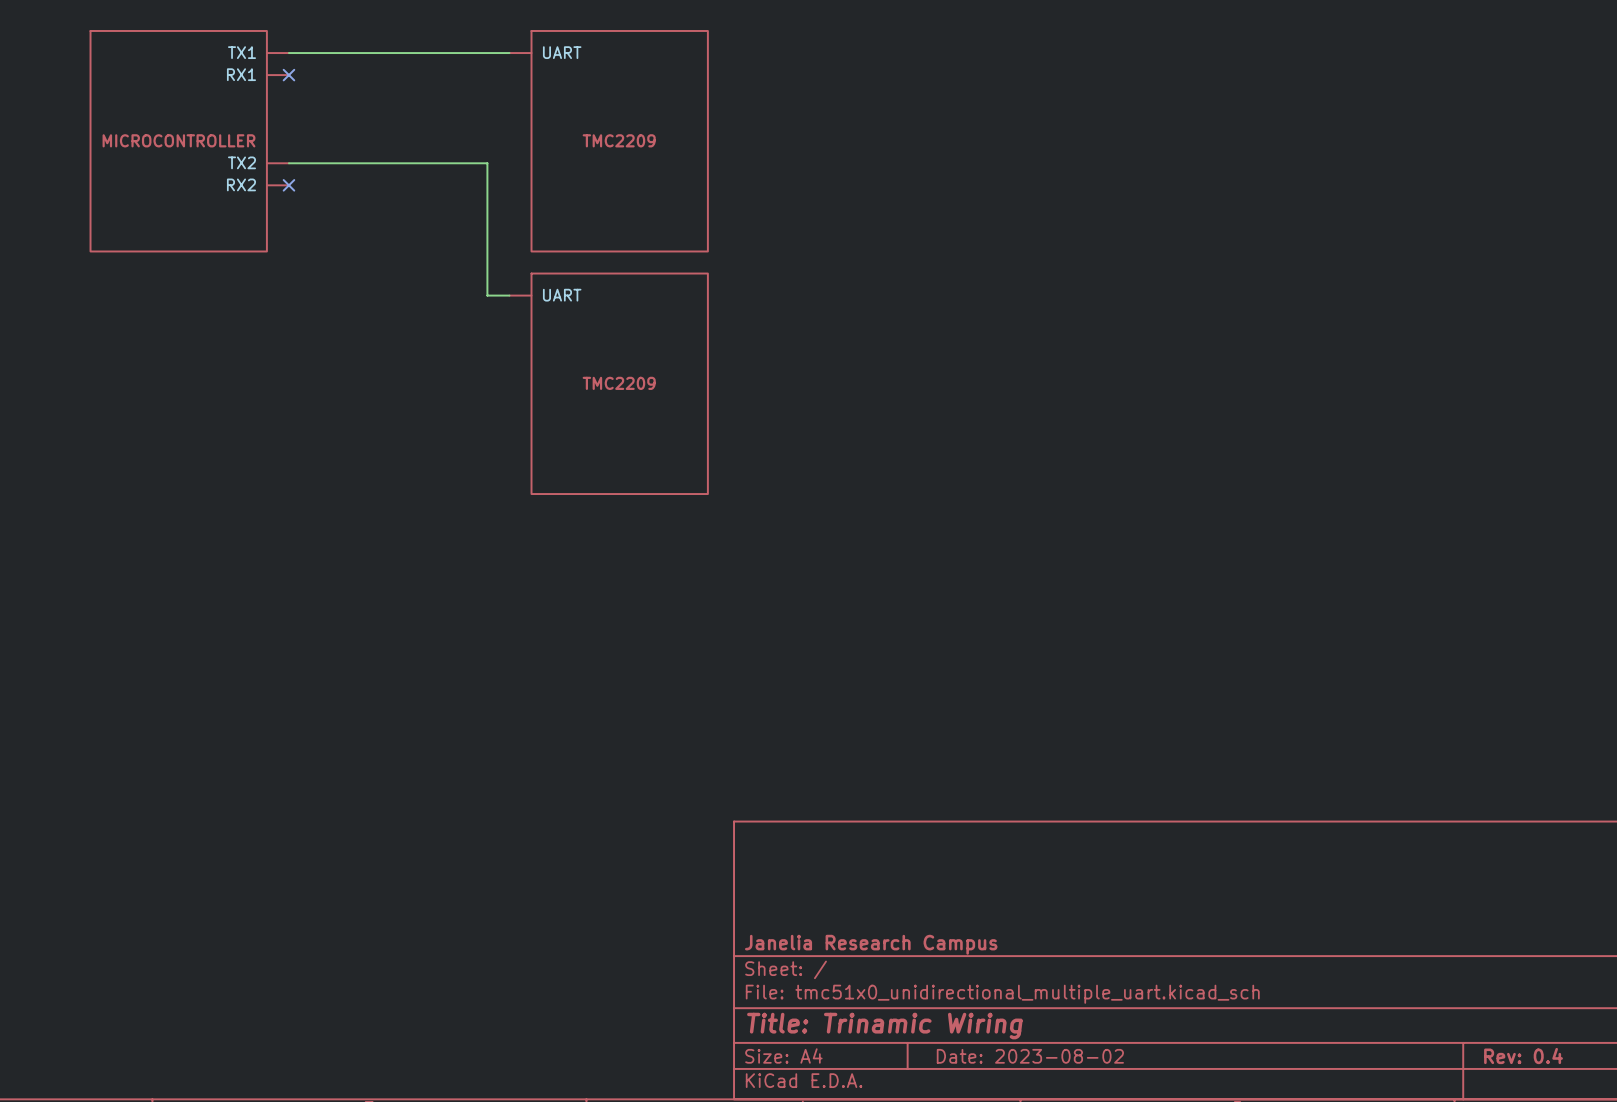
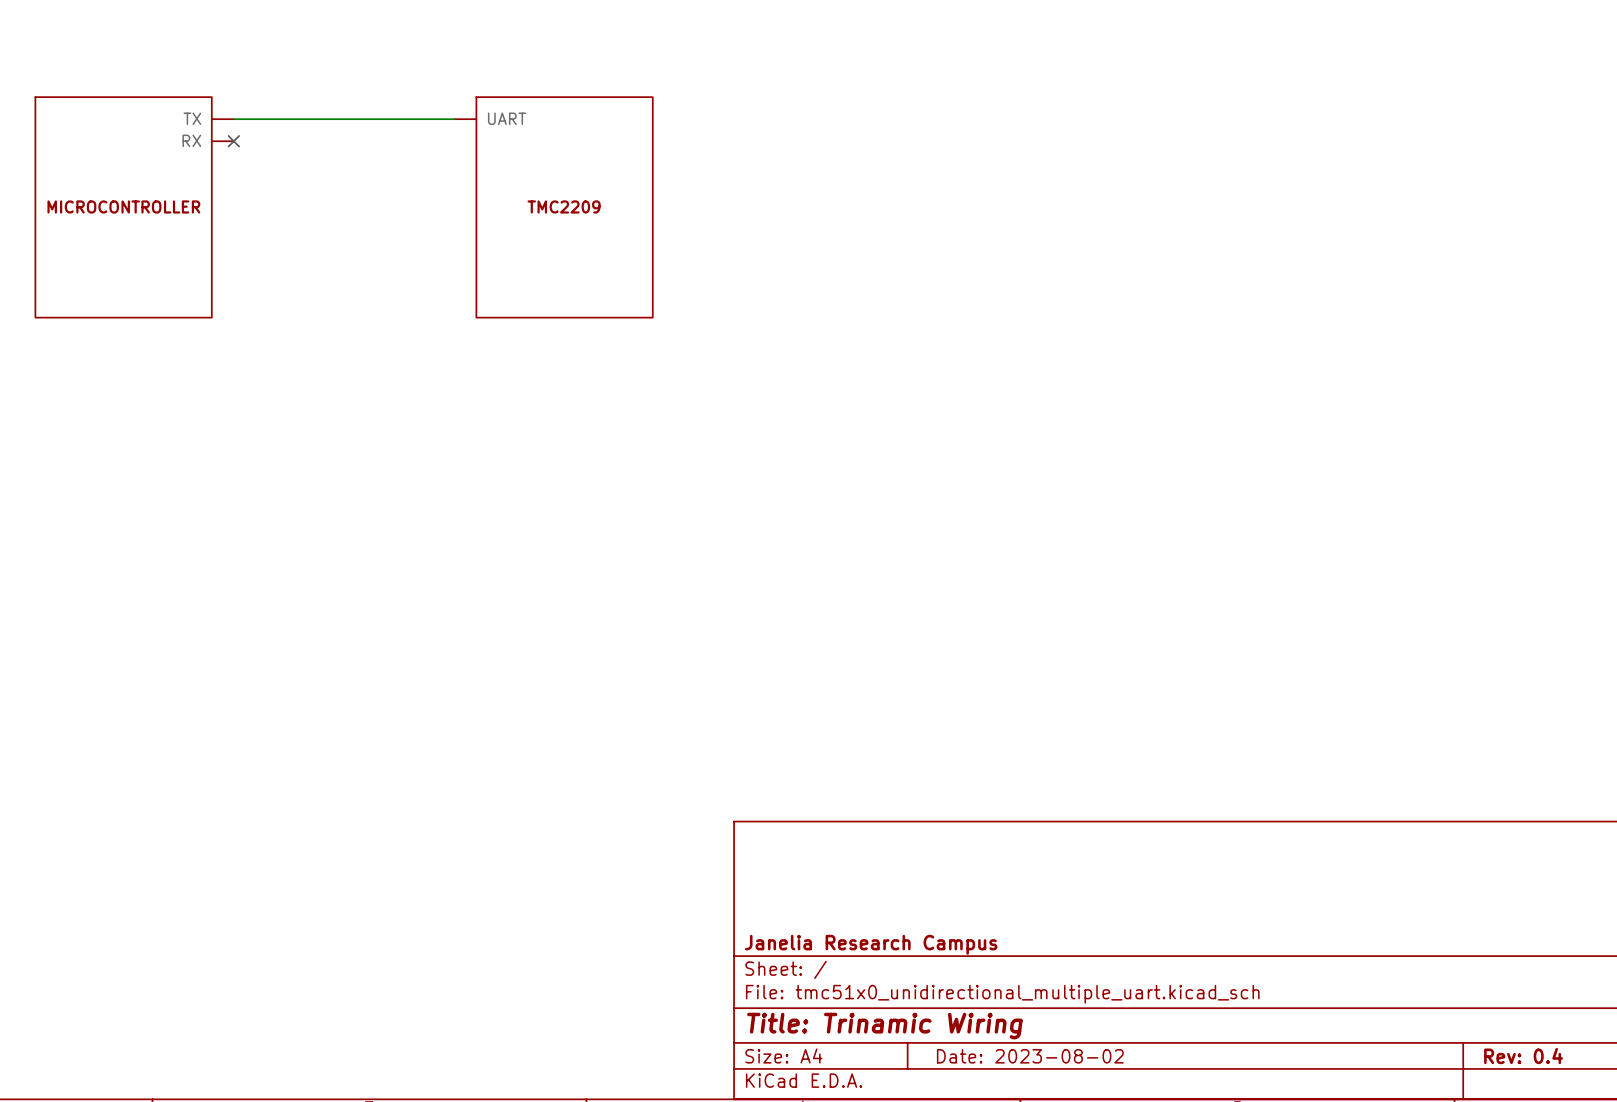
wire: (288, 53) (509, 53) -> (233, 119) (454, 119)
no-connect mark: (288, 75) -> none
part: (189, 141) -> none
no-connect mark: none -> (233, 141)
part position: (608, 141) -> (553, 207)
wire: (288, 163) (487, 163) (487, 295) (509, 295) -> none
no-connect mark: (288, 185) -> none
part: none -> (134, 207)
part: (608, 383) -> none

